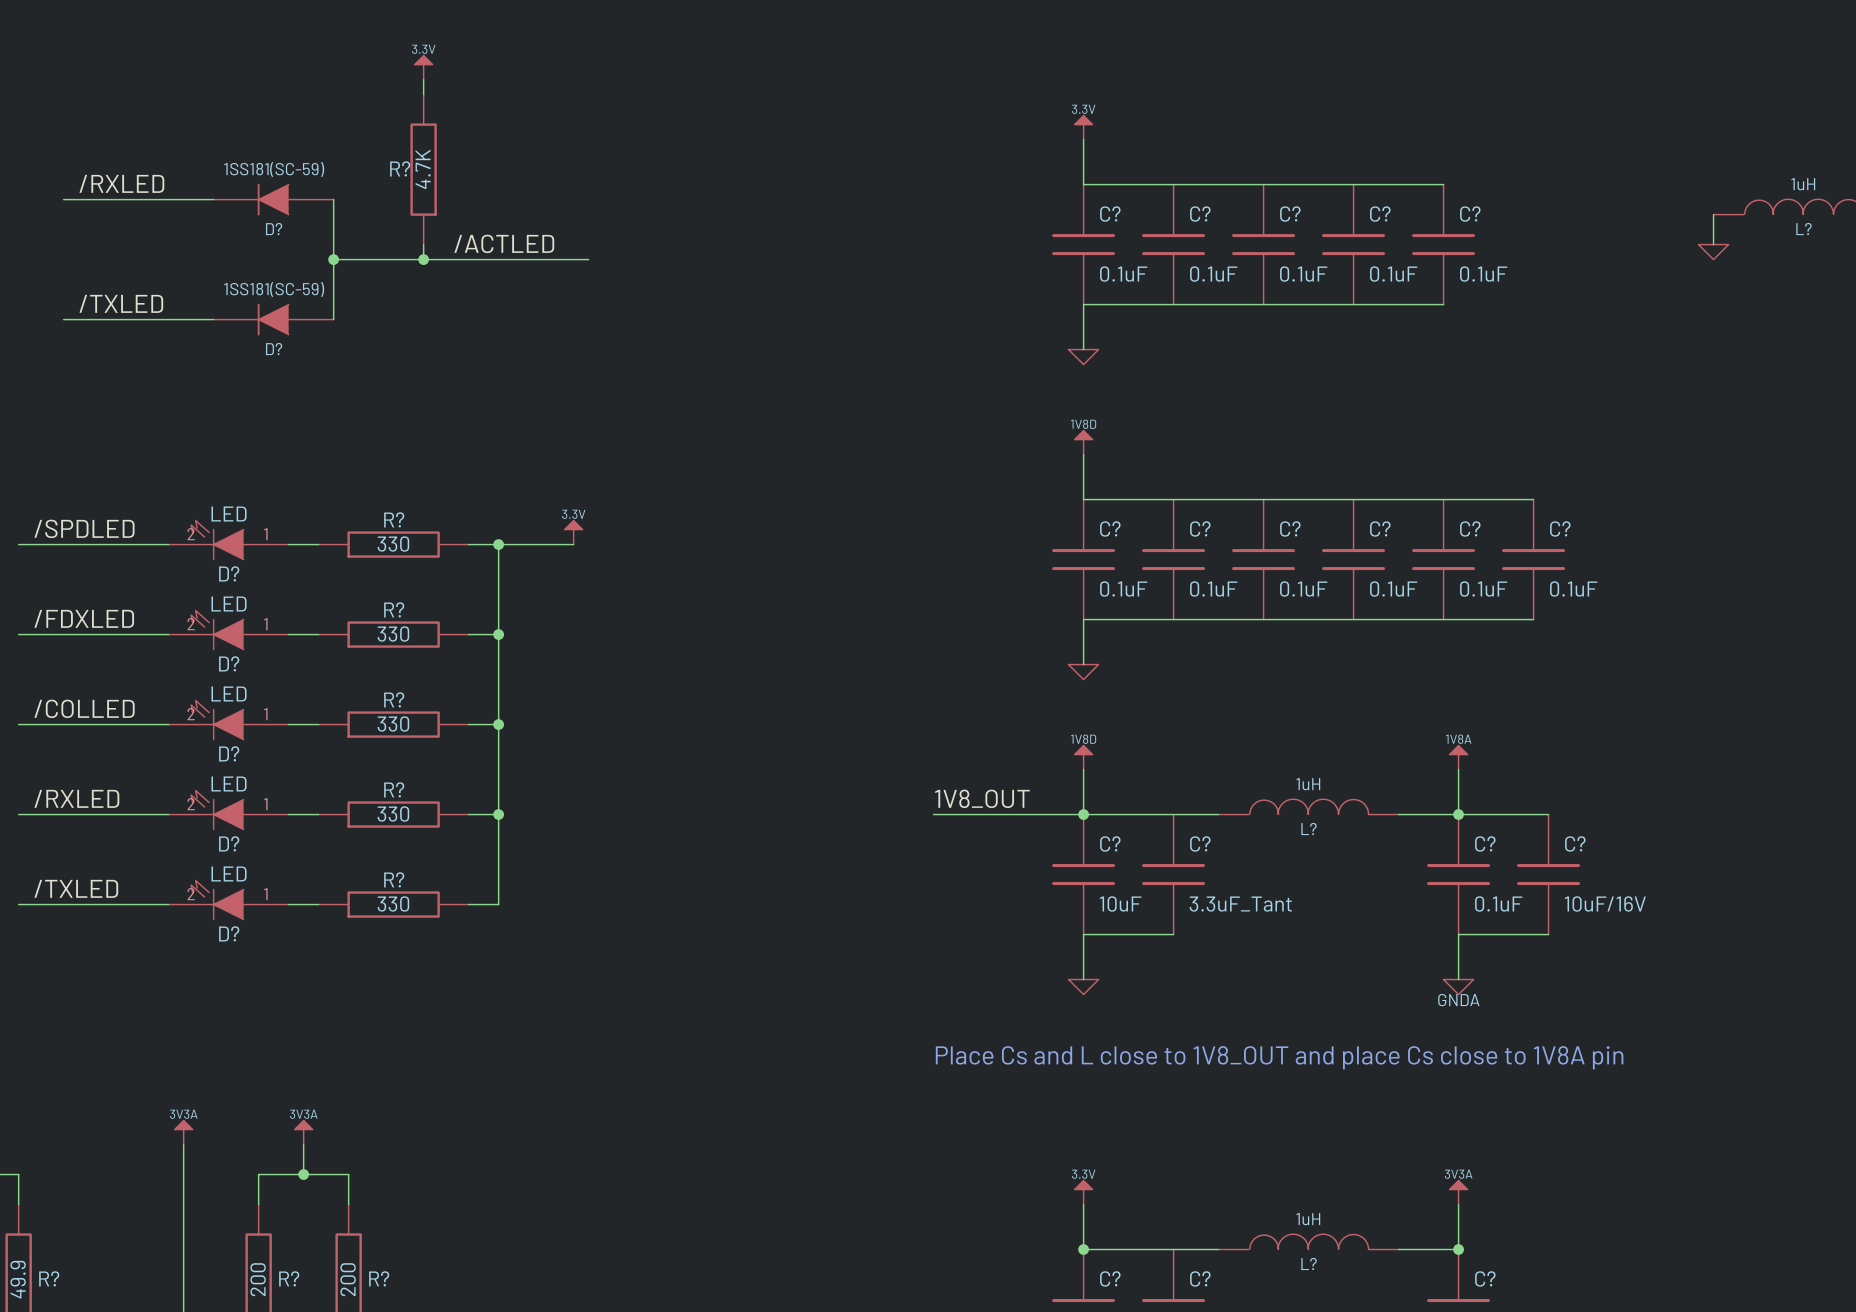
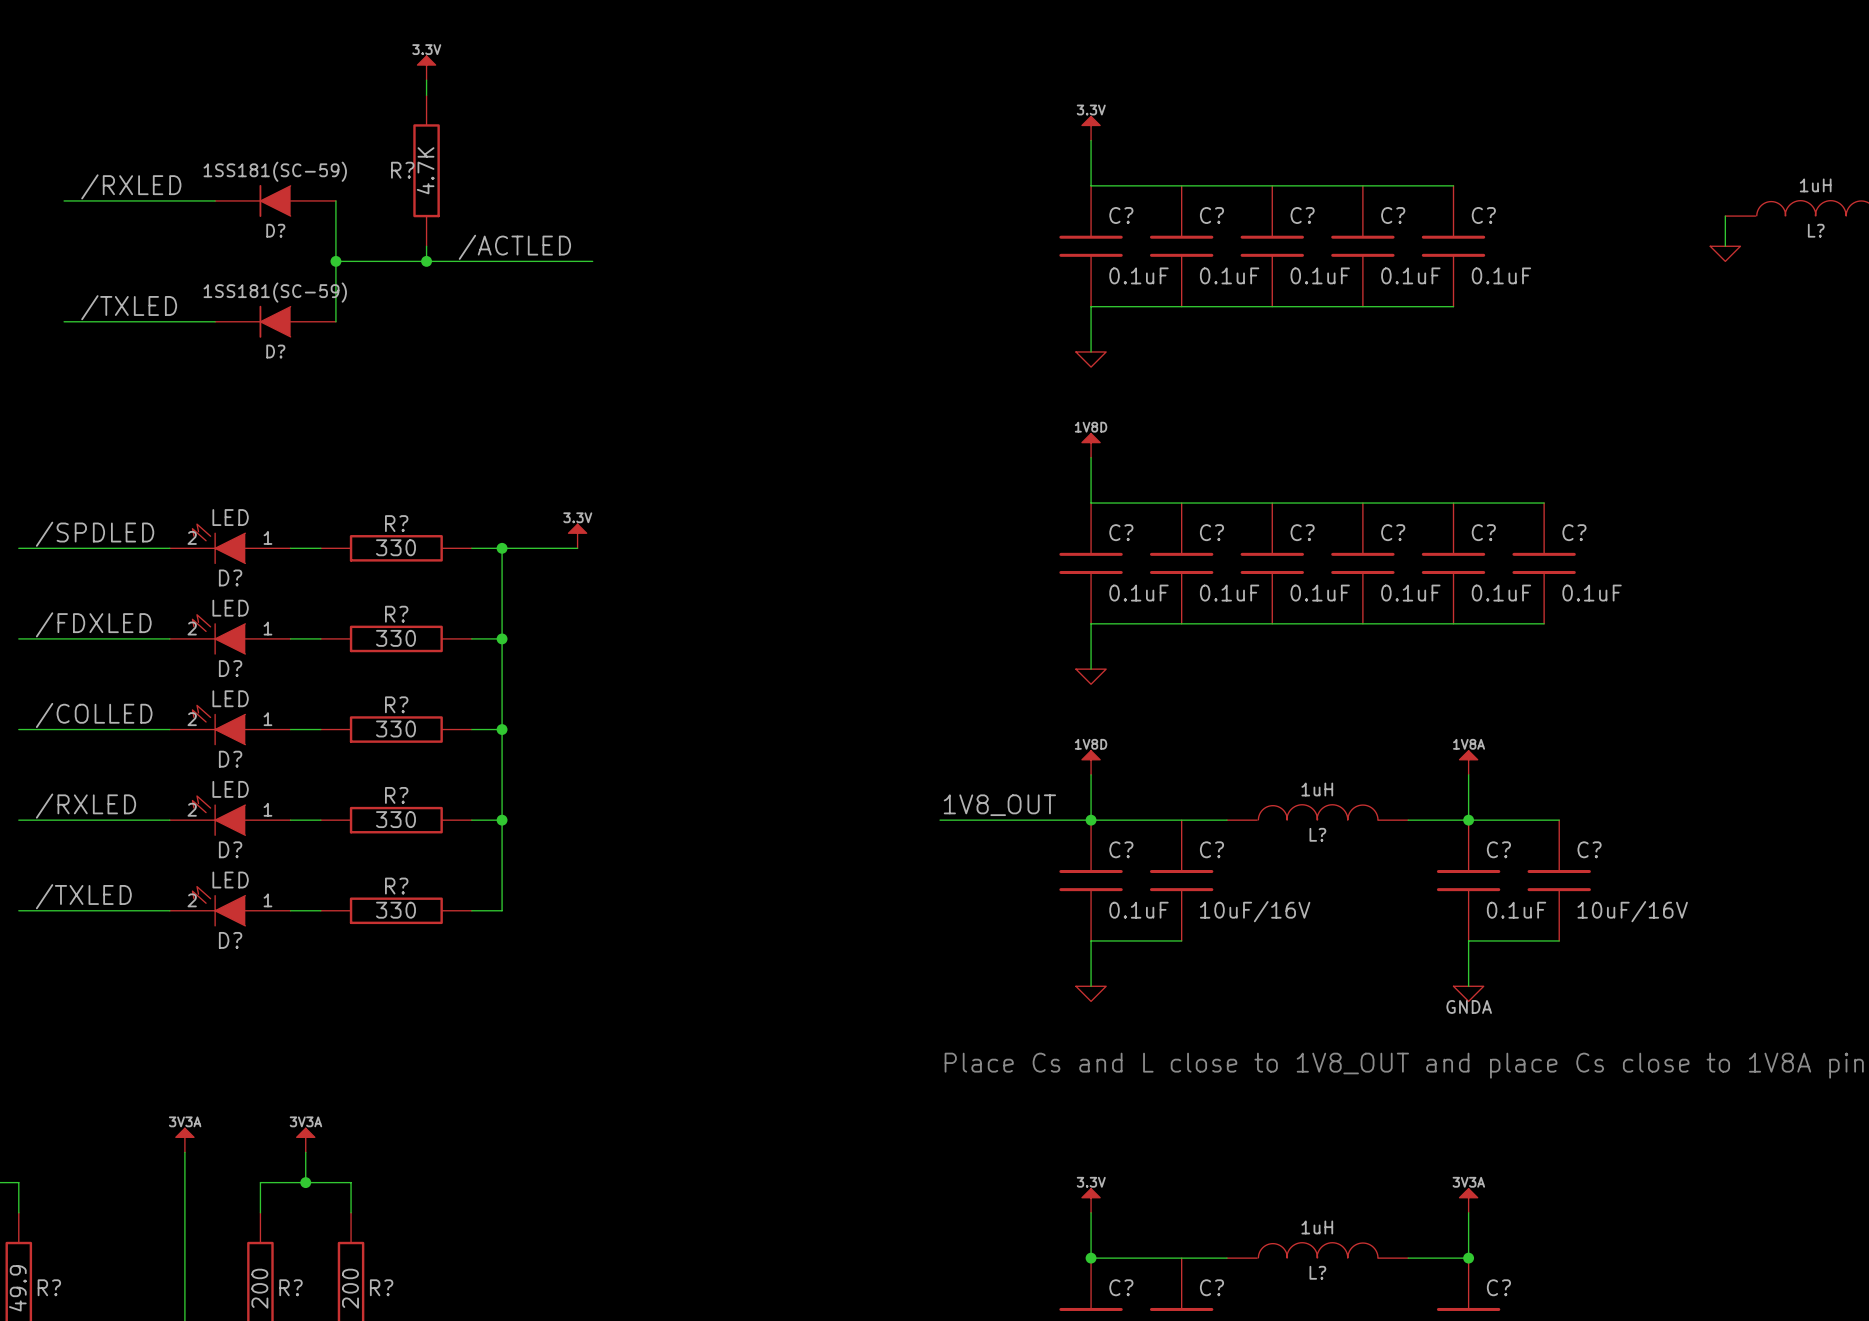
C? value: 10uF (1120, 903) -> 0.1uF (1138, 910)
C? value: 3.3uF_Tant (1240, 904) -> 10uF/16V (1255, 911)

